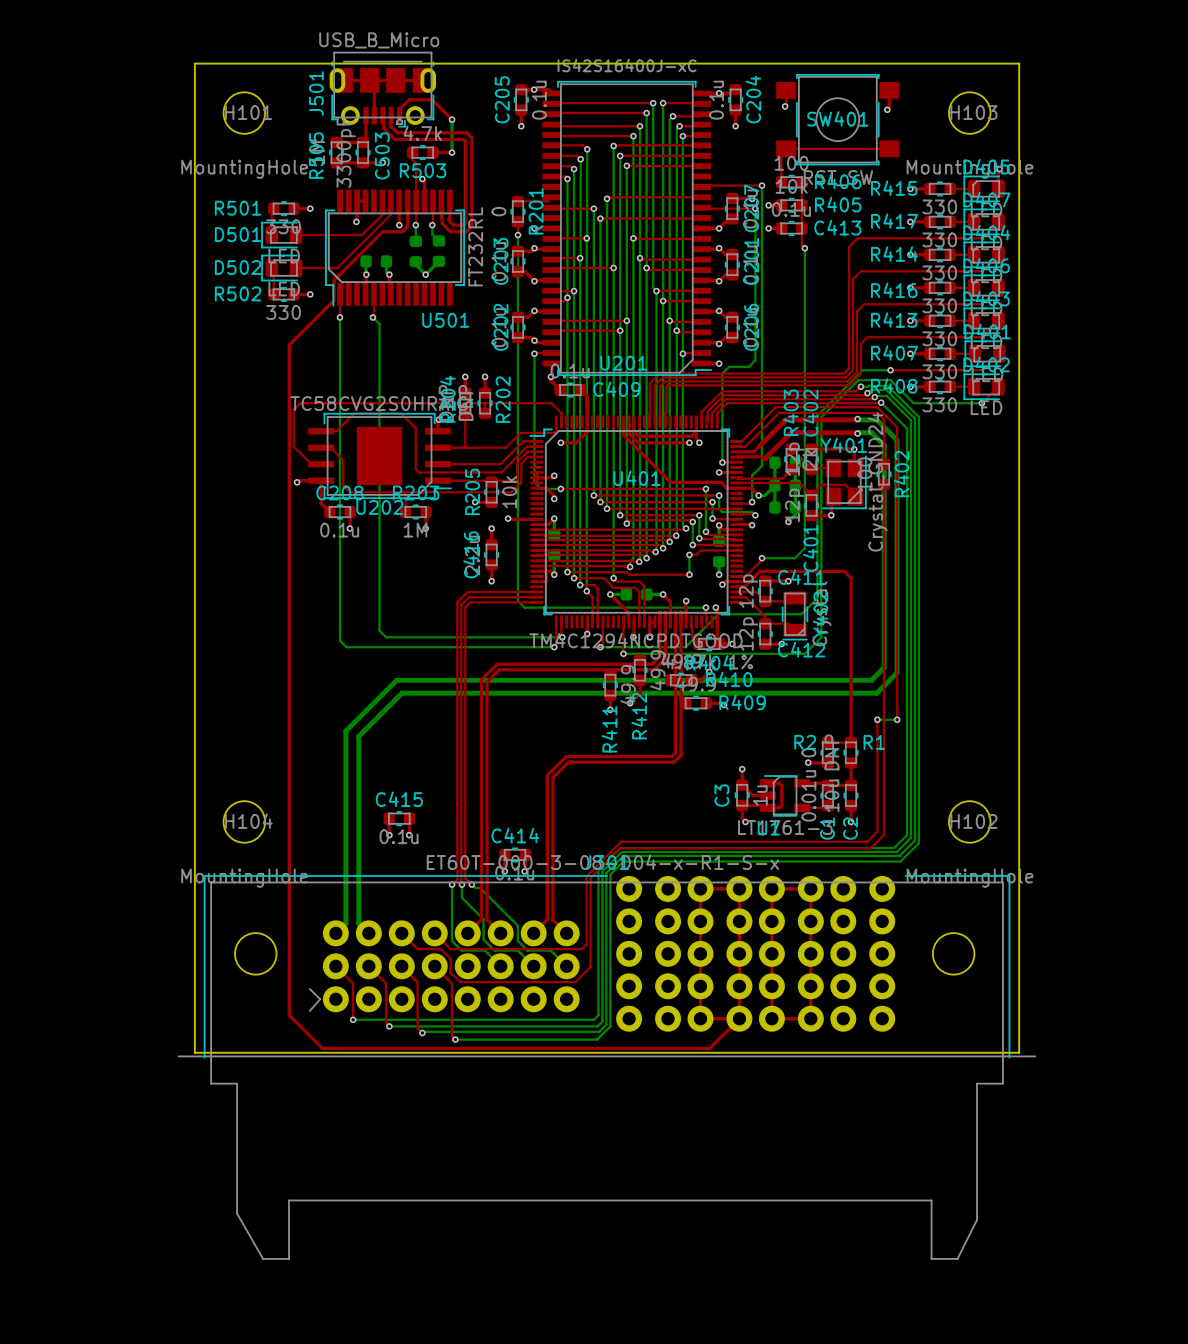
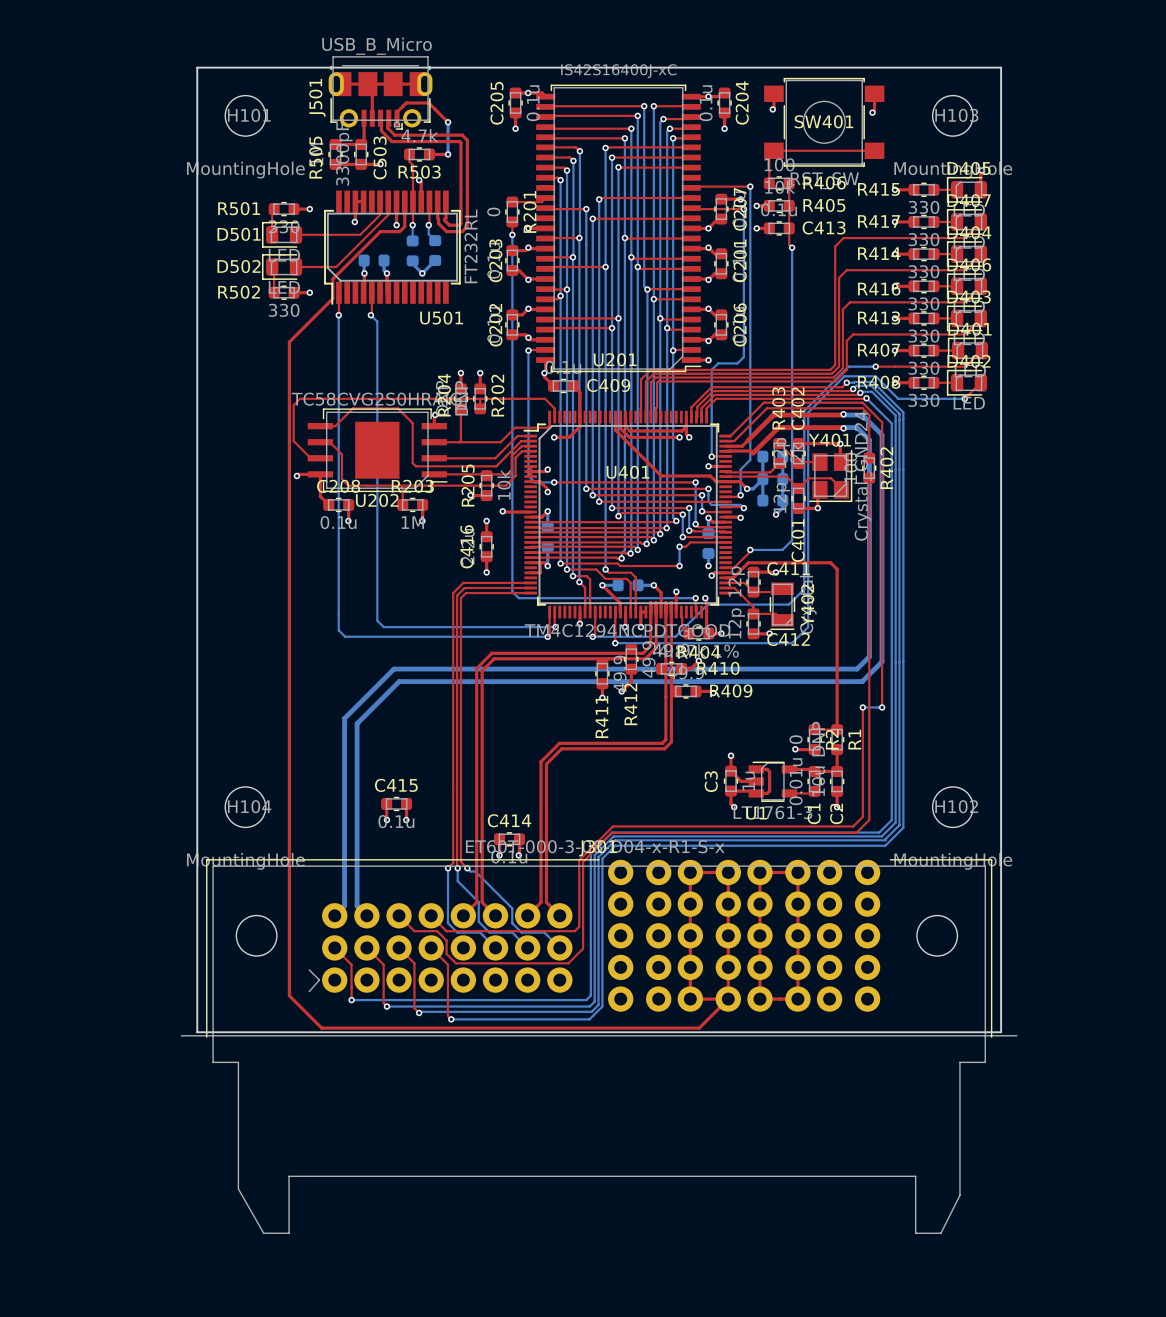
R2 name rotation: 0° (805, 742) -> 90° counterclockwise (832, 739)
R2 name position: R2 (805, 742) -> R2 (832, 739)
R1 name rotation: 0° (874, 742) -> 90° counterclockwise (854, 739)

